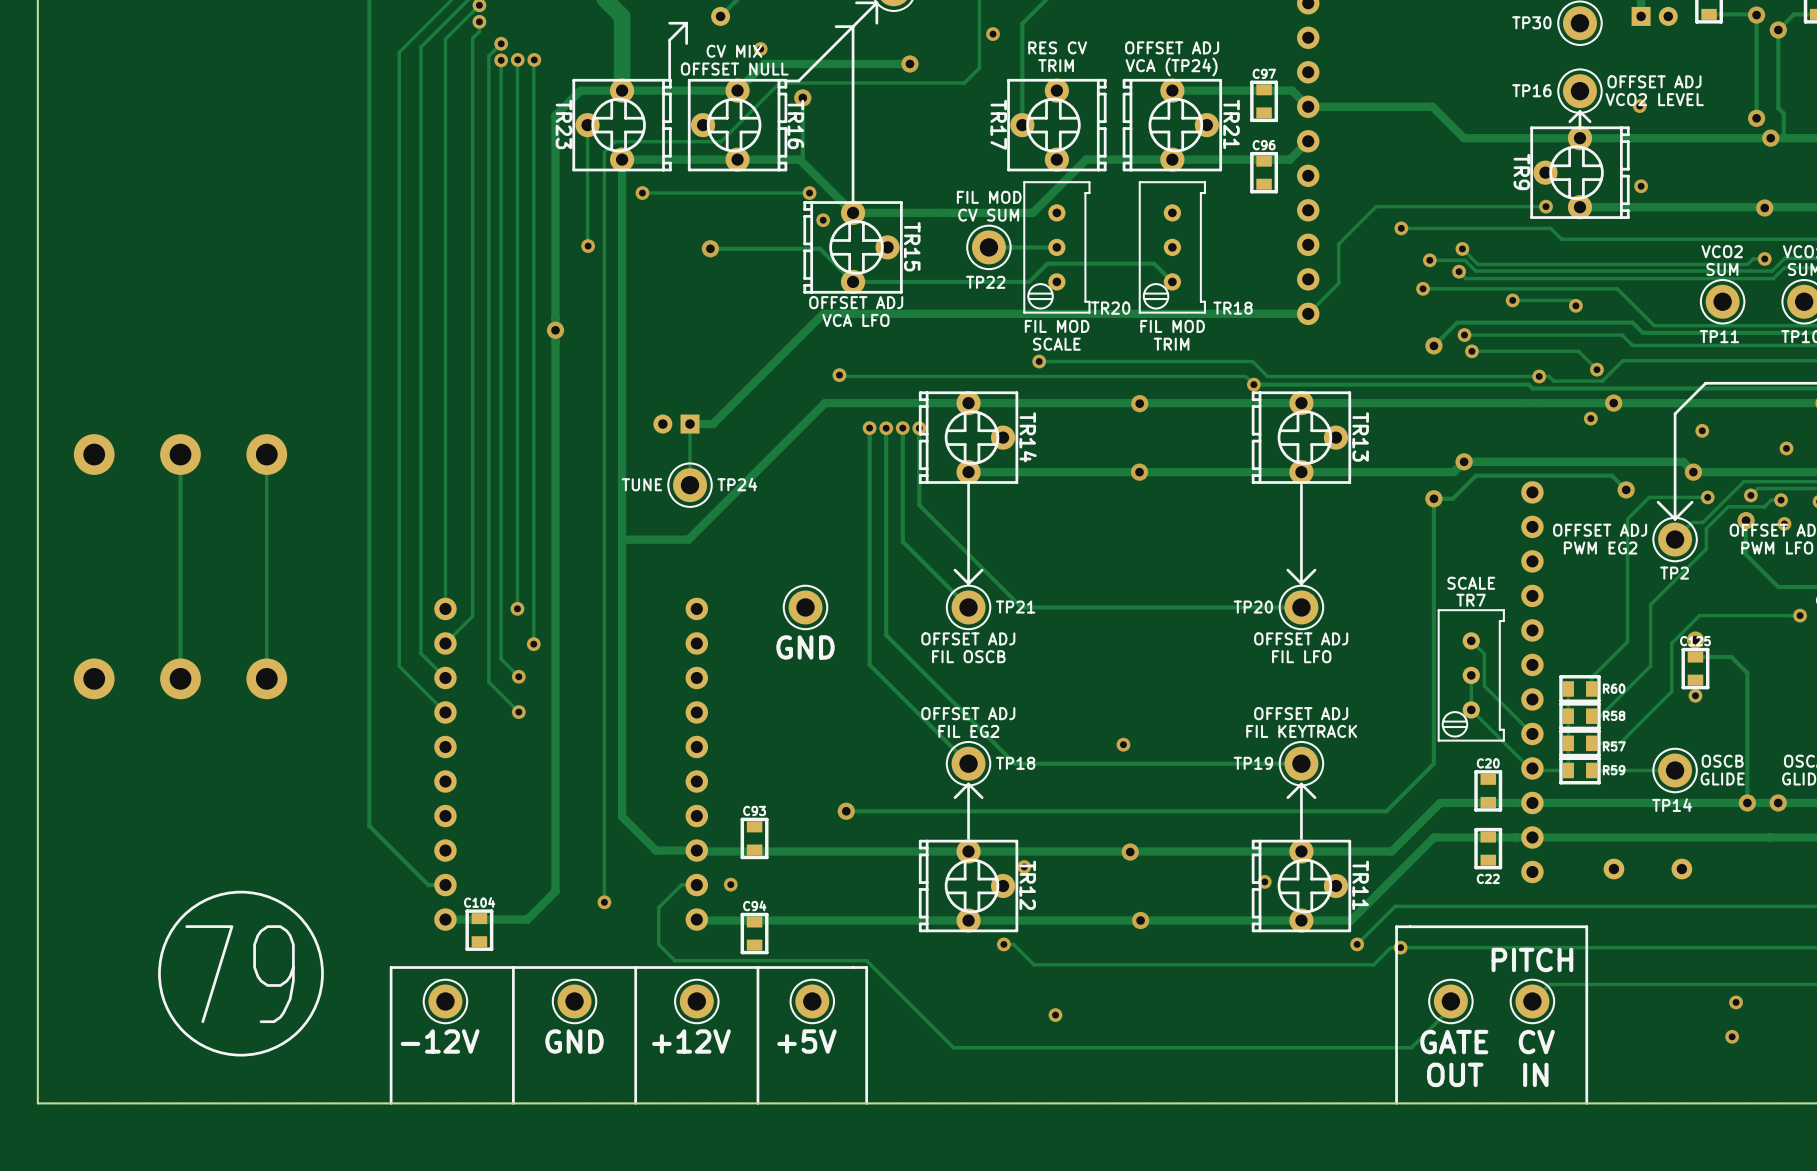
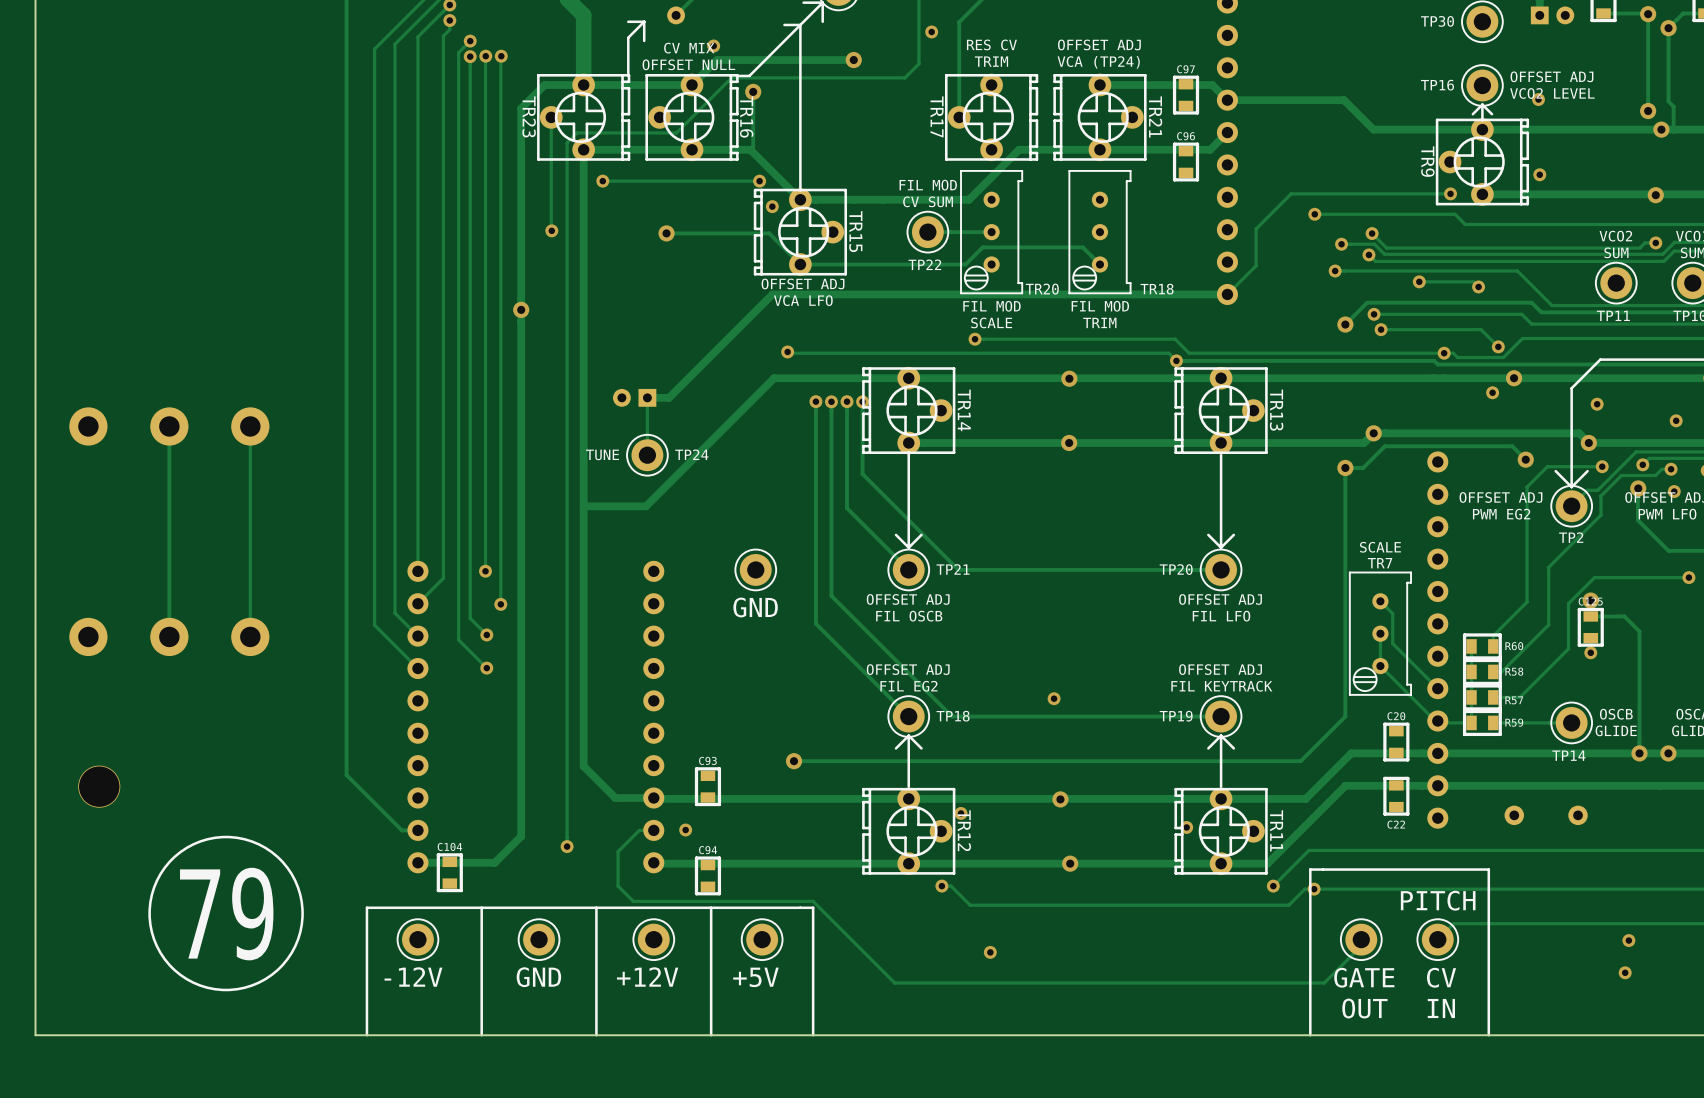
part: none -> (99, 786)

